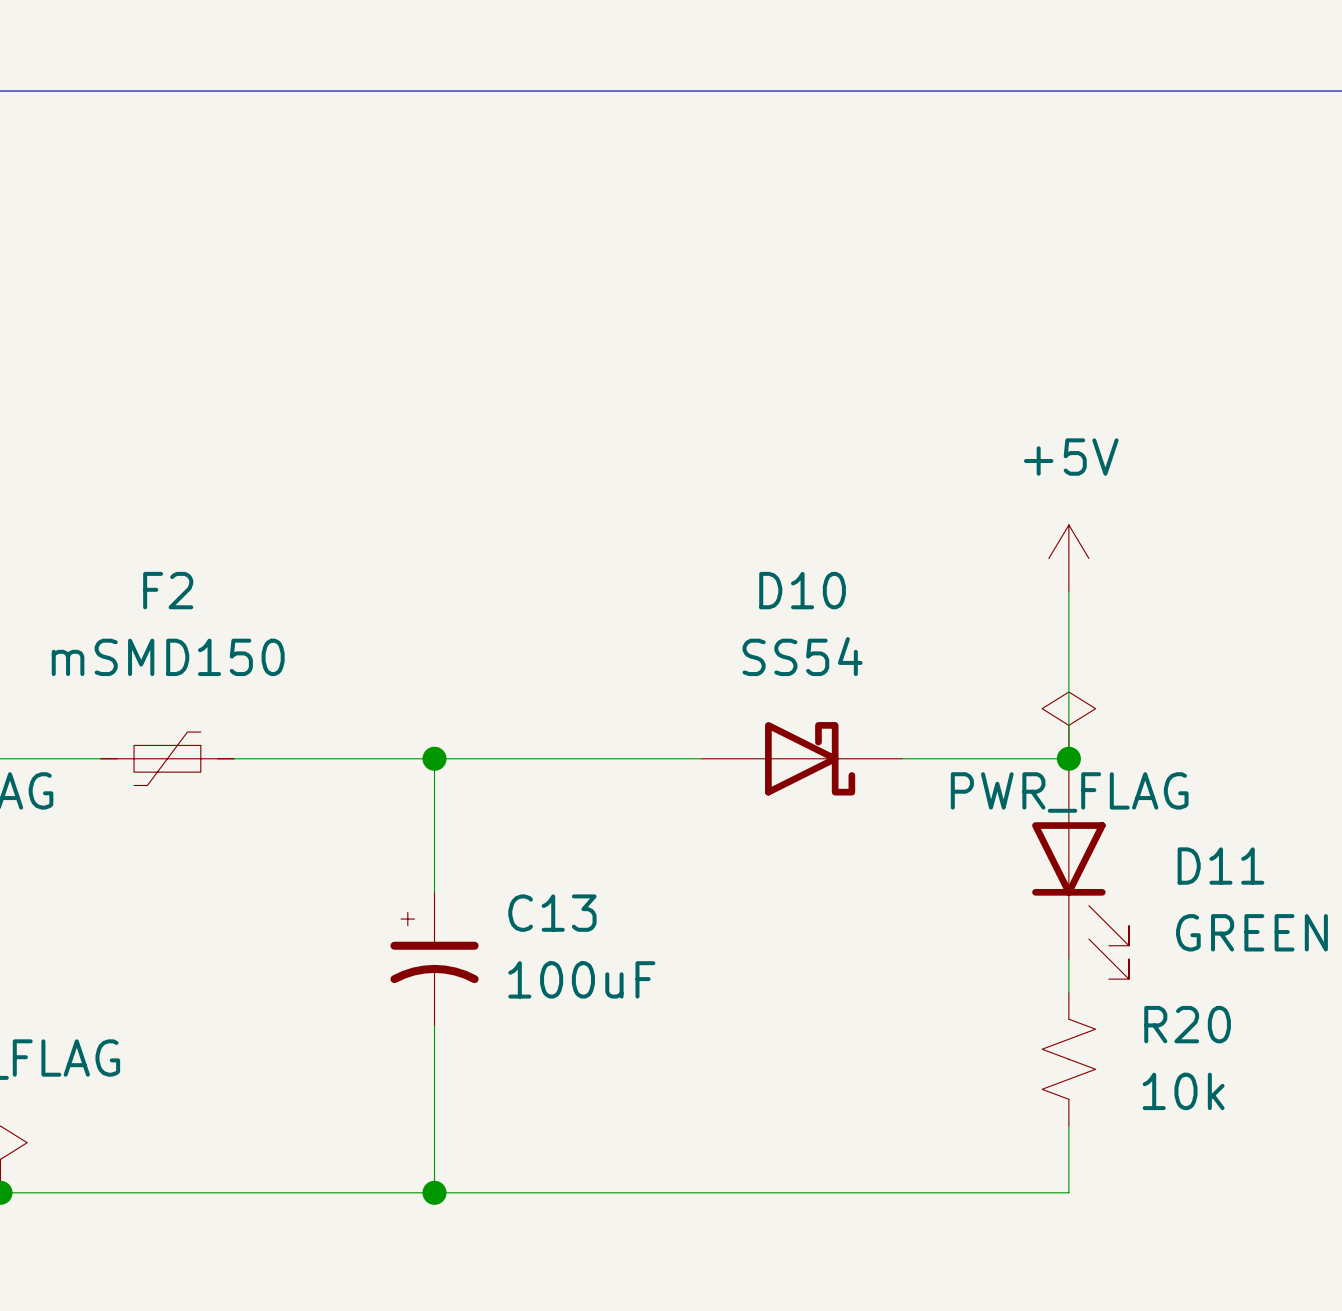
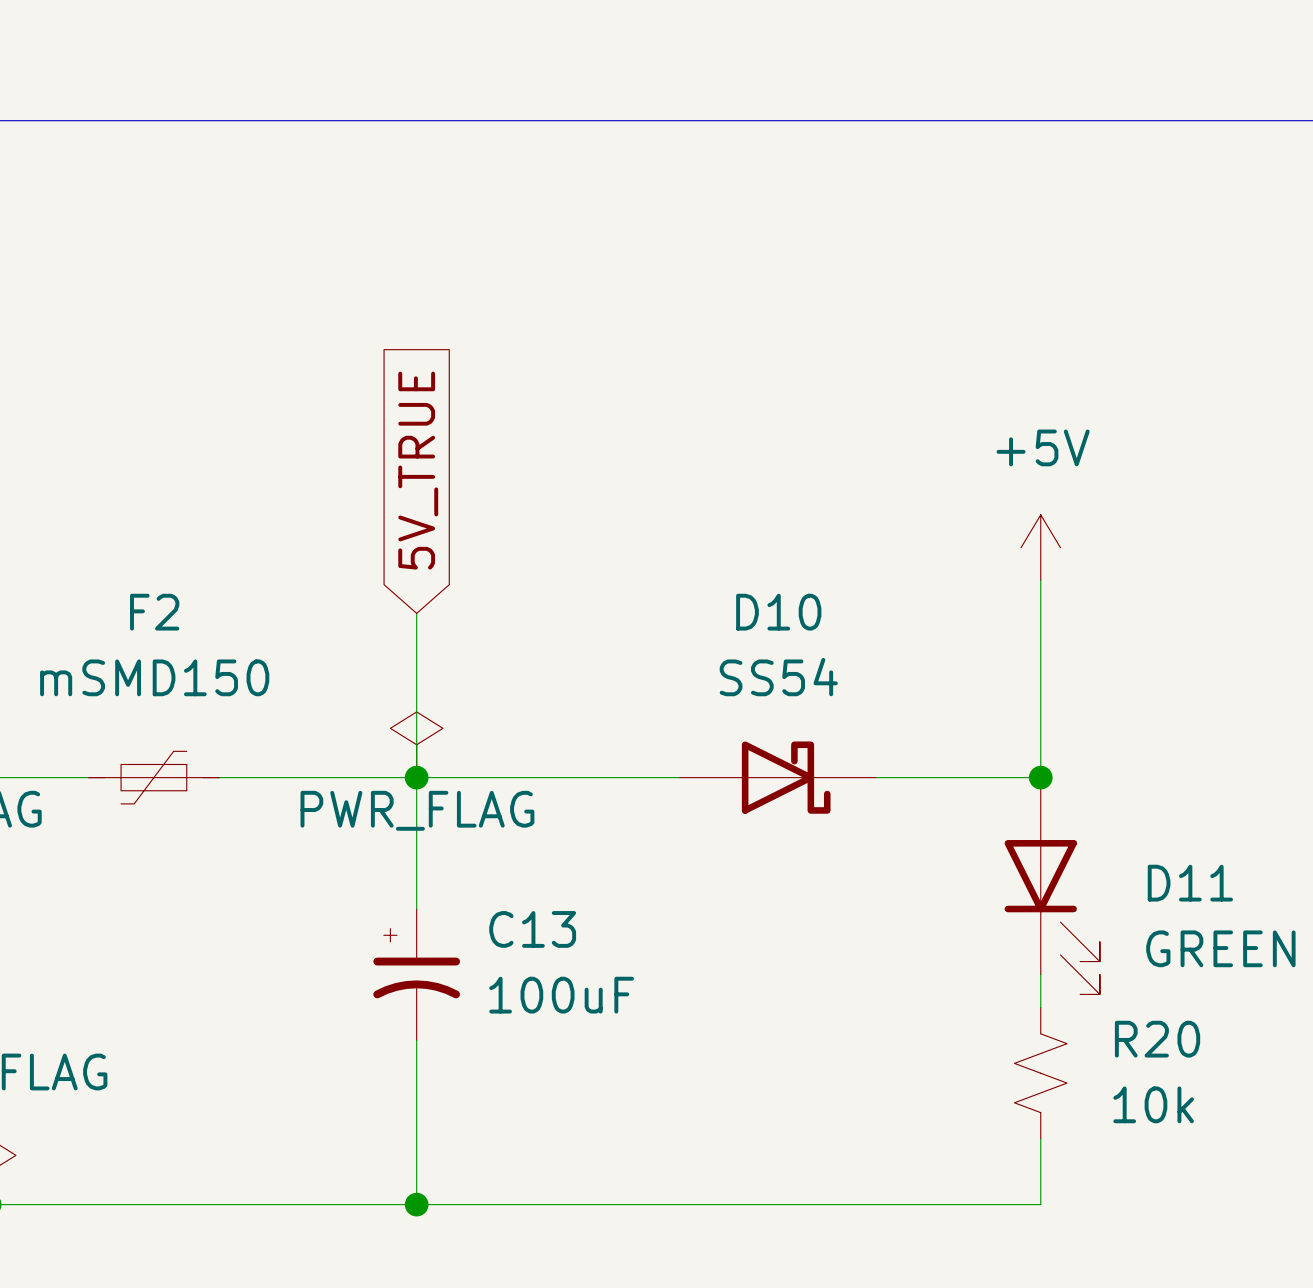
global label: none -> 5V_TRUE (418, 470)
power symbol position: +5V (1068, 558) -> +5V (1040, 547)
wire: none -> (416, 613) (416, 777)
power symbol position: PWR_FLAG (1068, 725) -> PWR_FLAG (416, 744)

